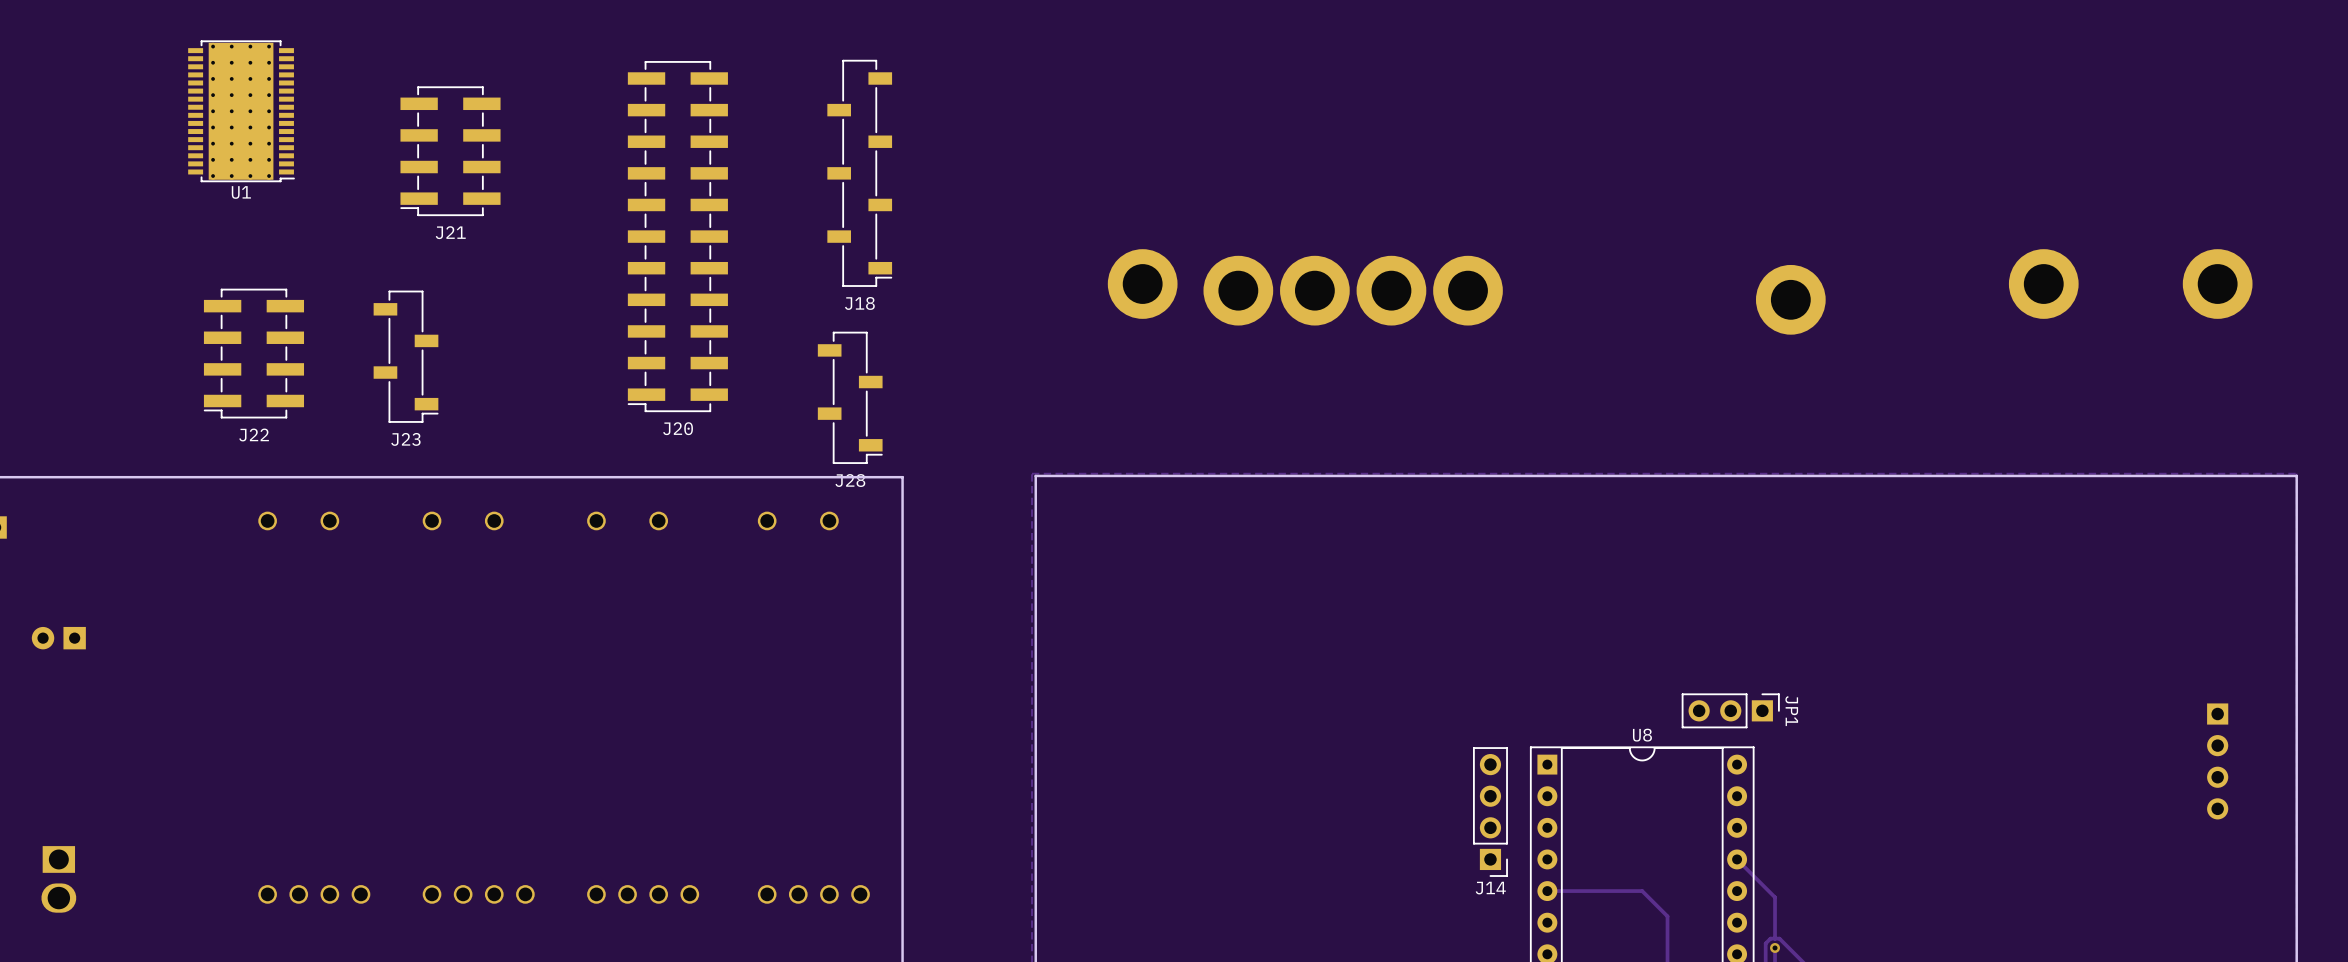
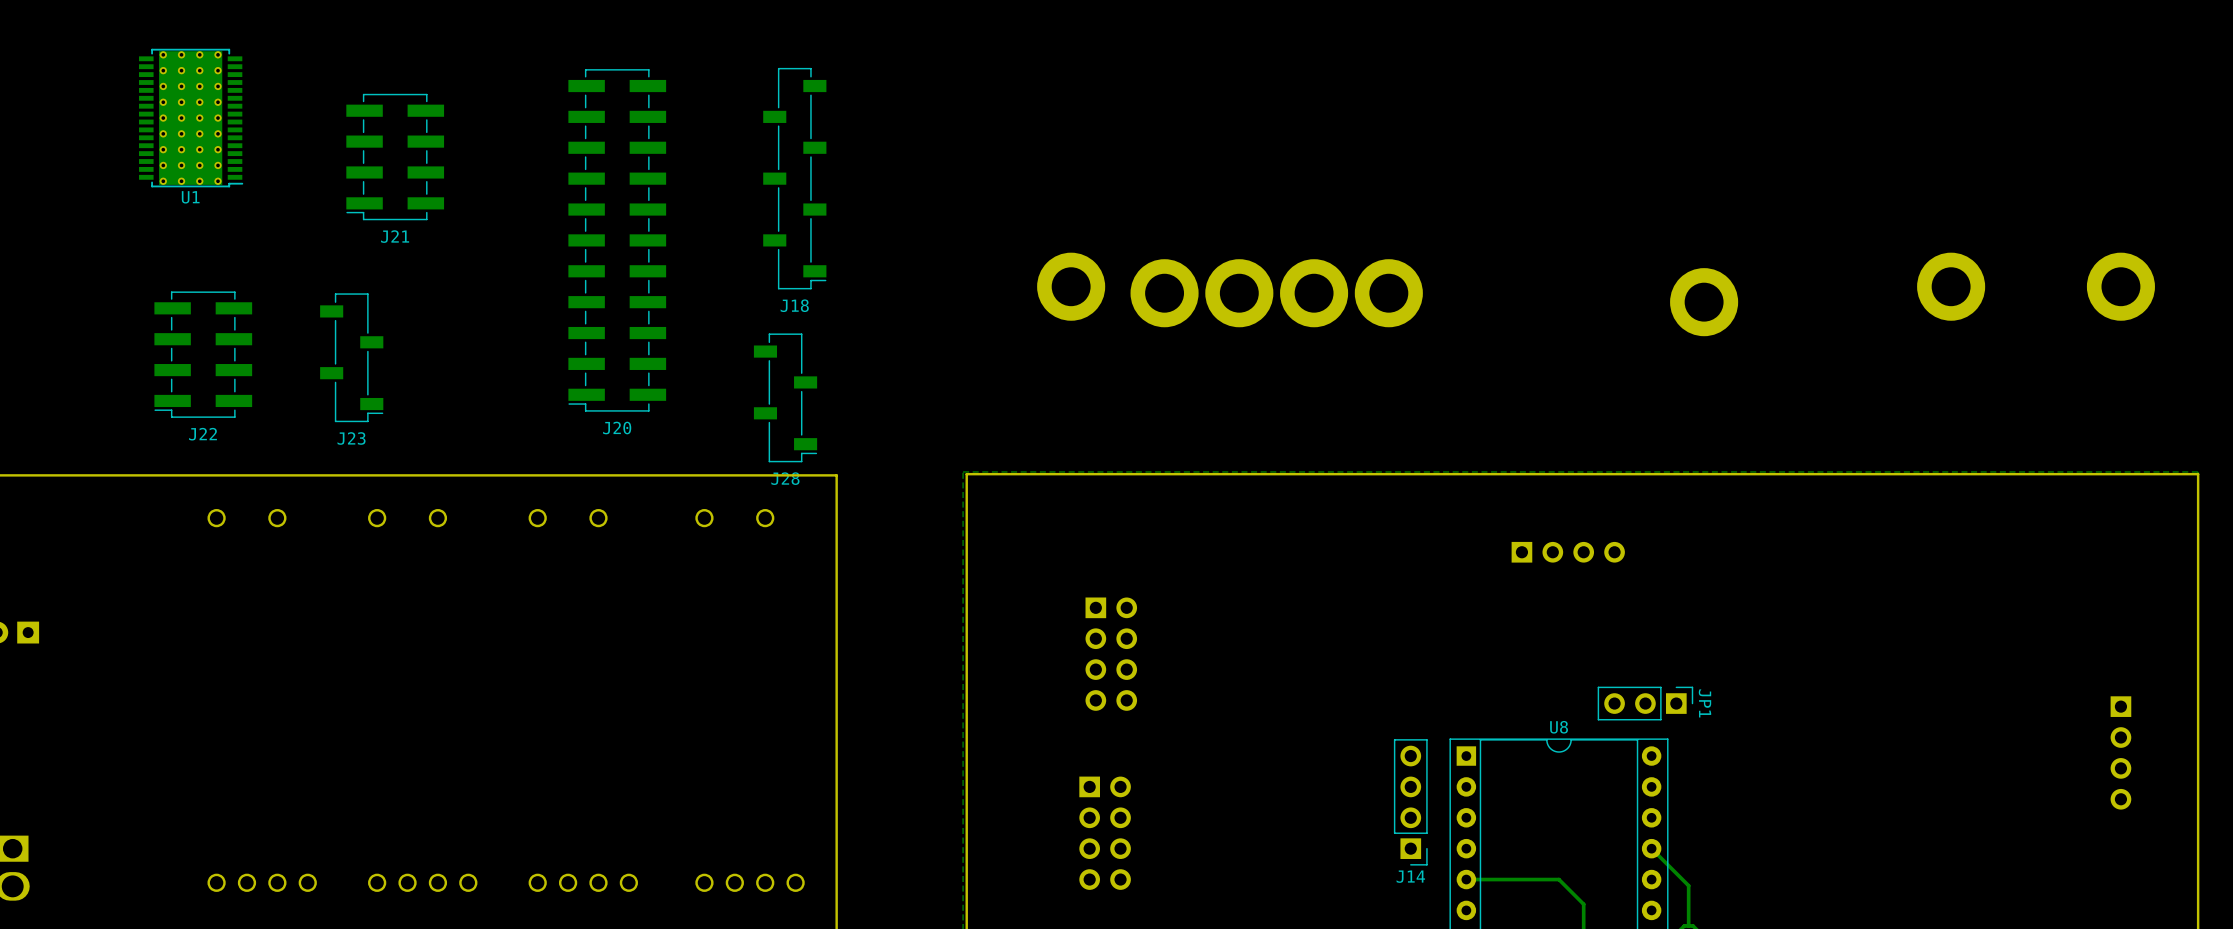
part: none -> (1568, 552)
part: none -> (1111, 654)
part: none -> (1105, 833)

